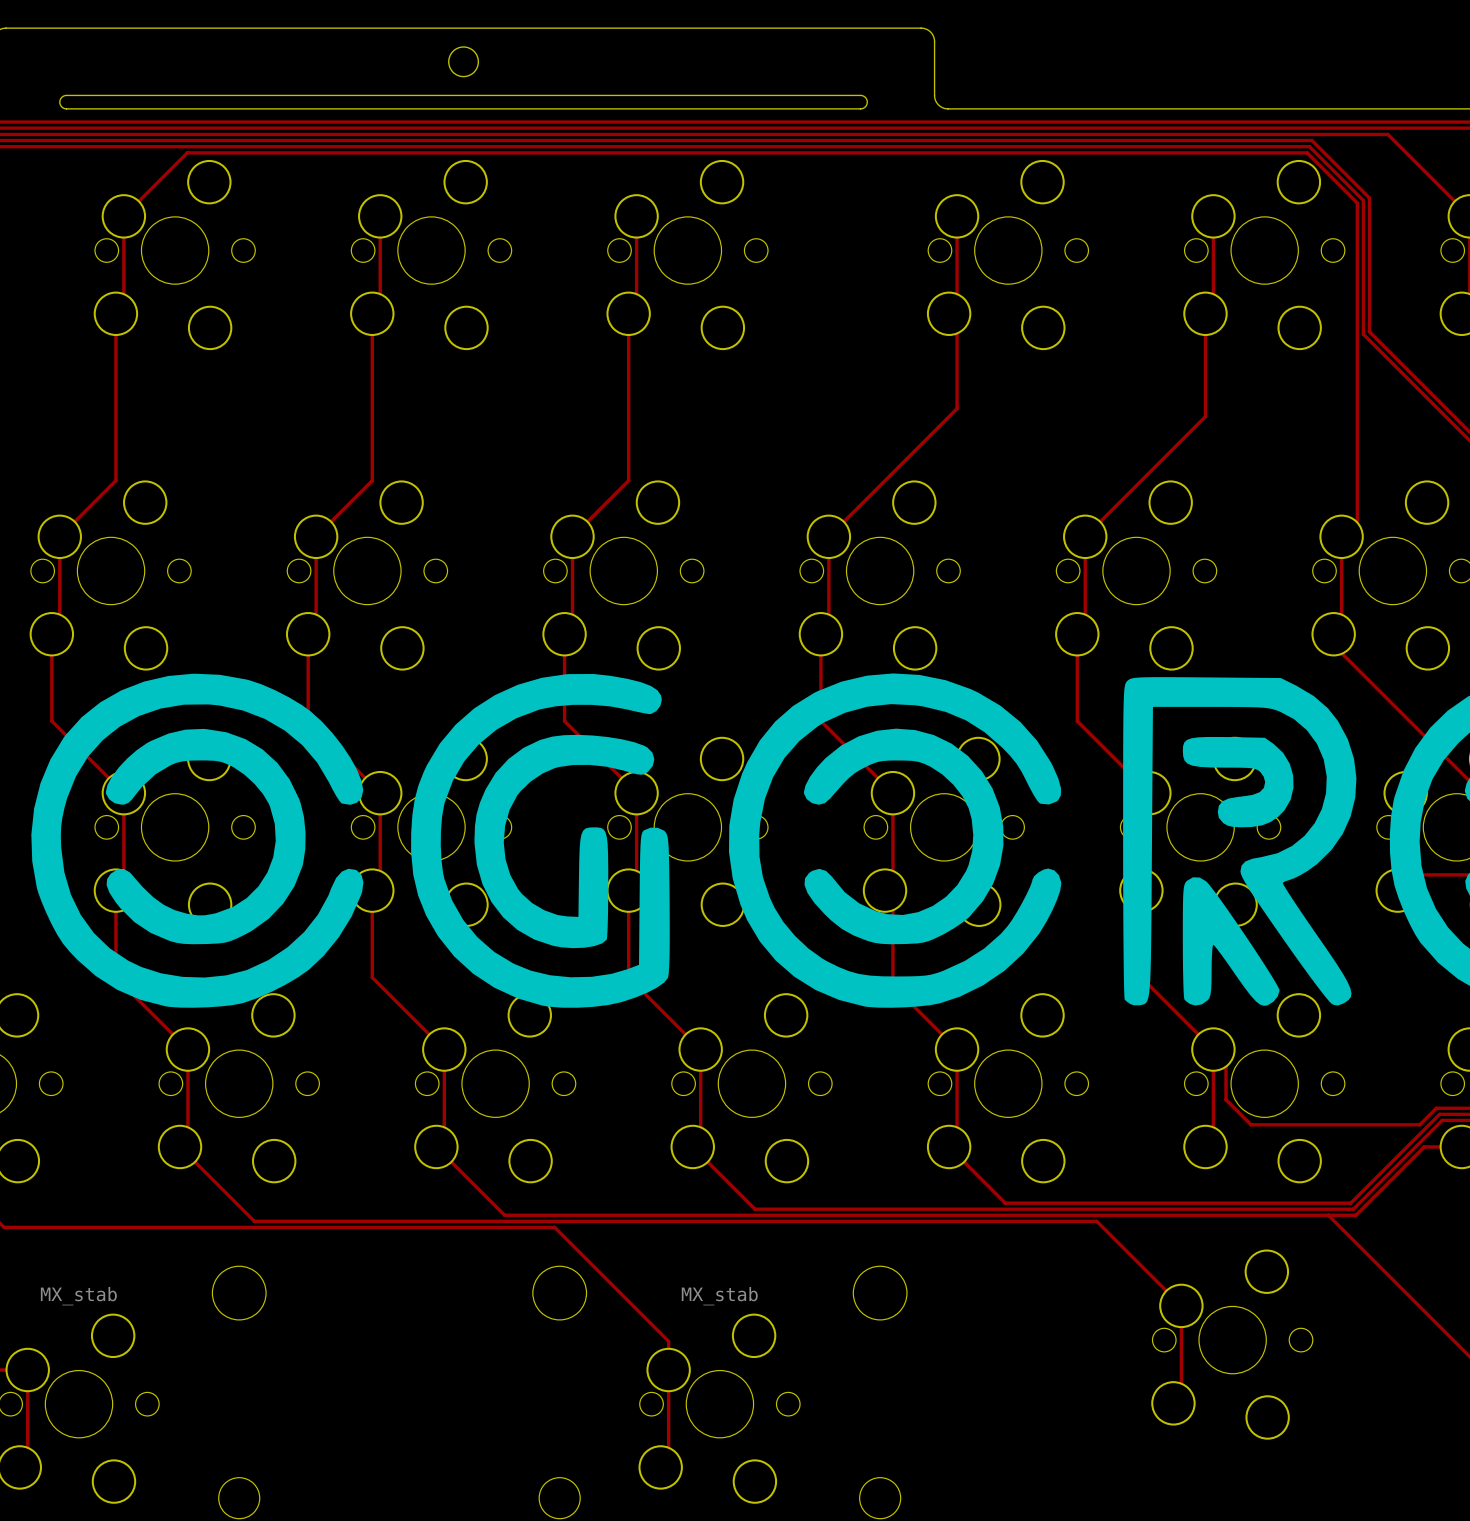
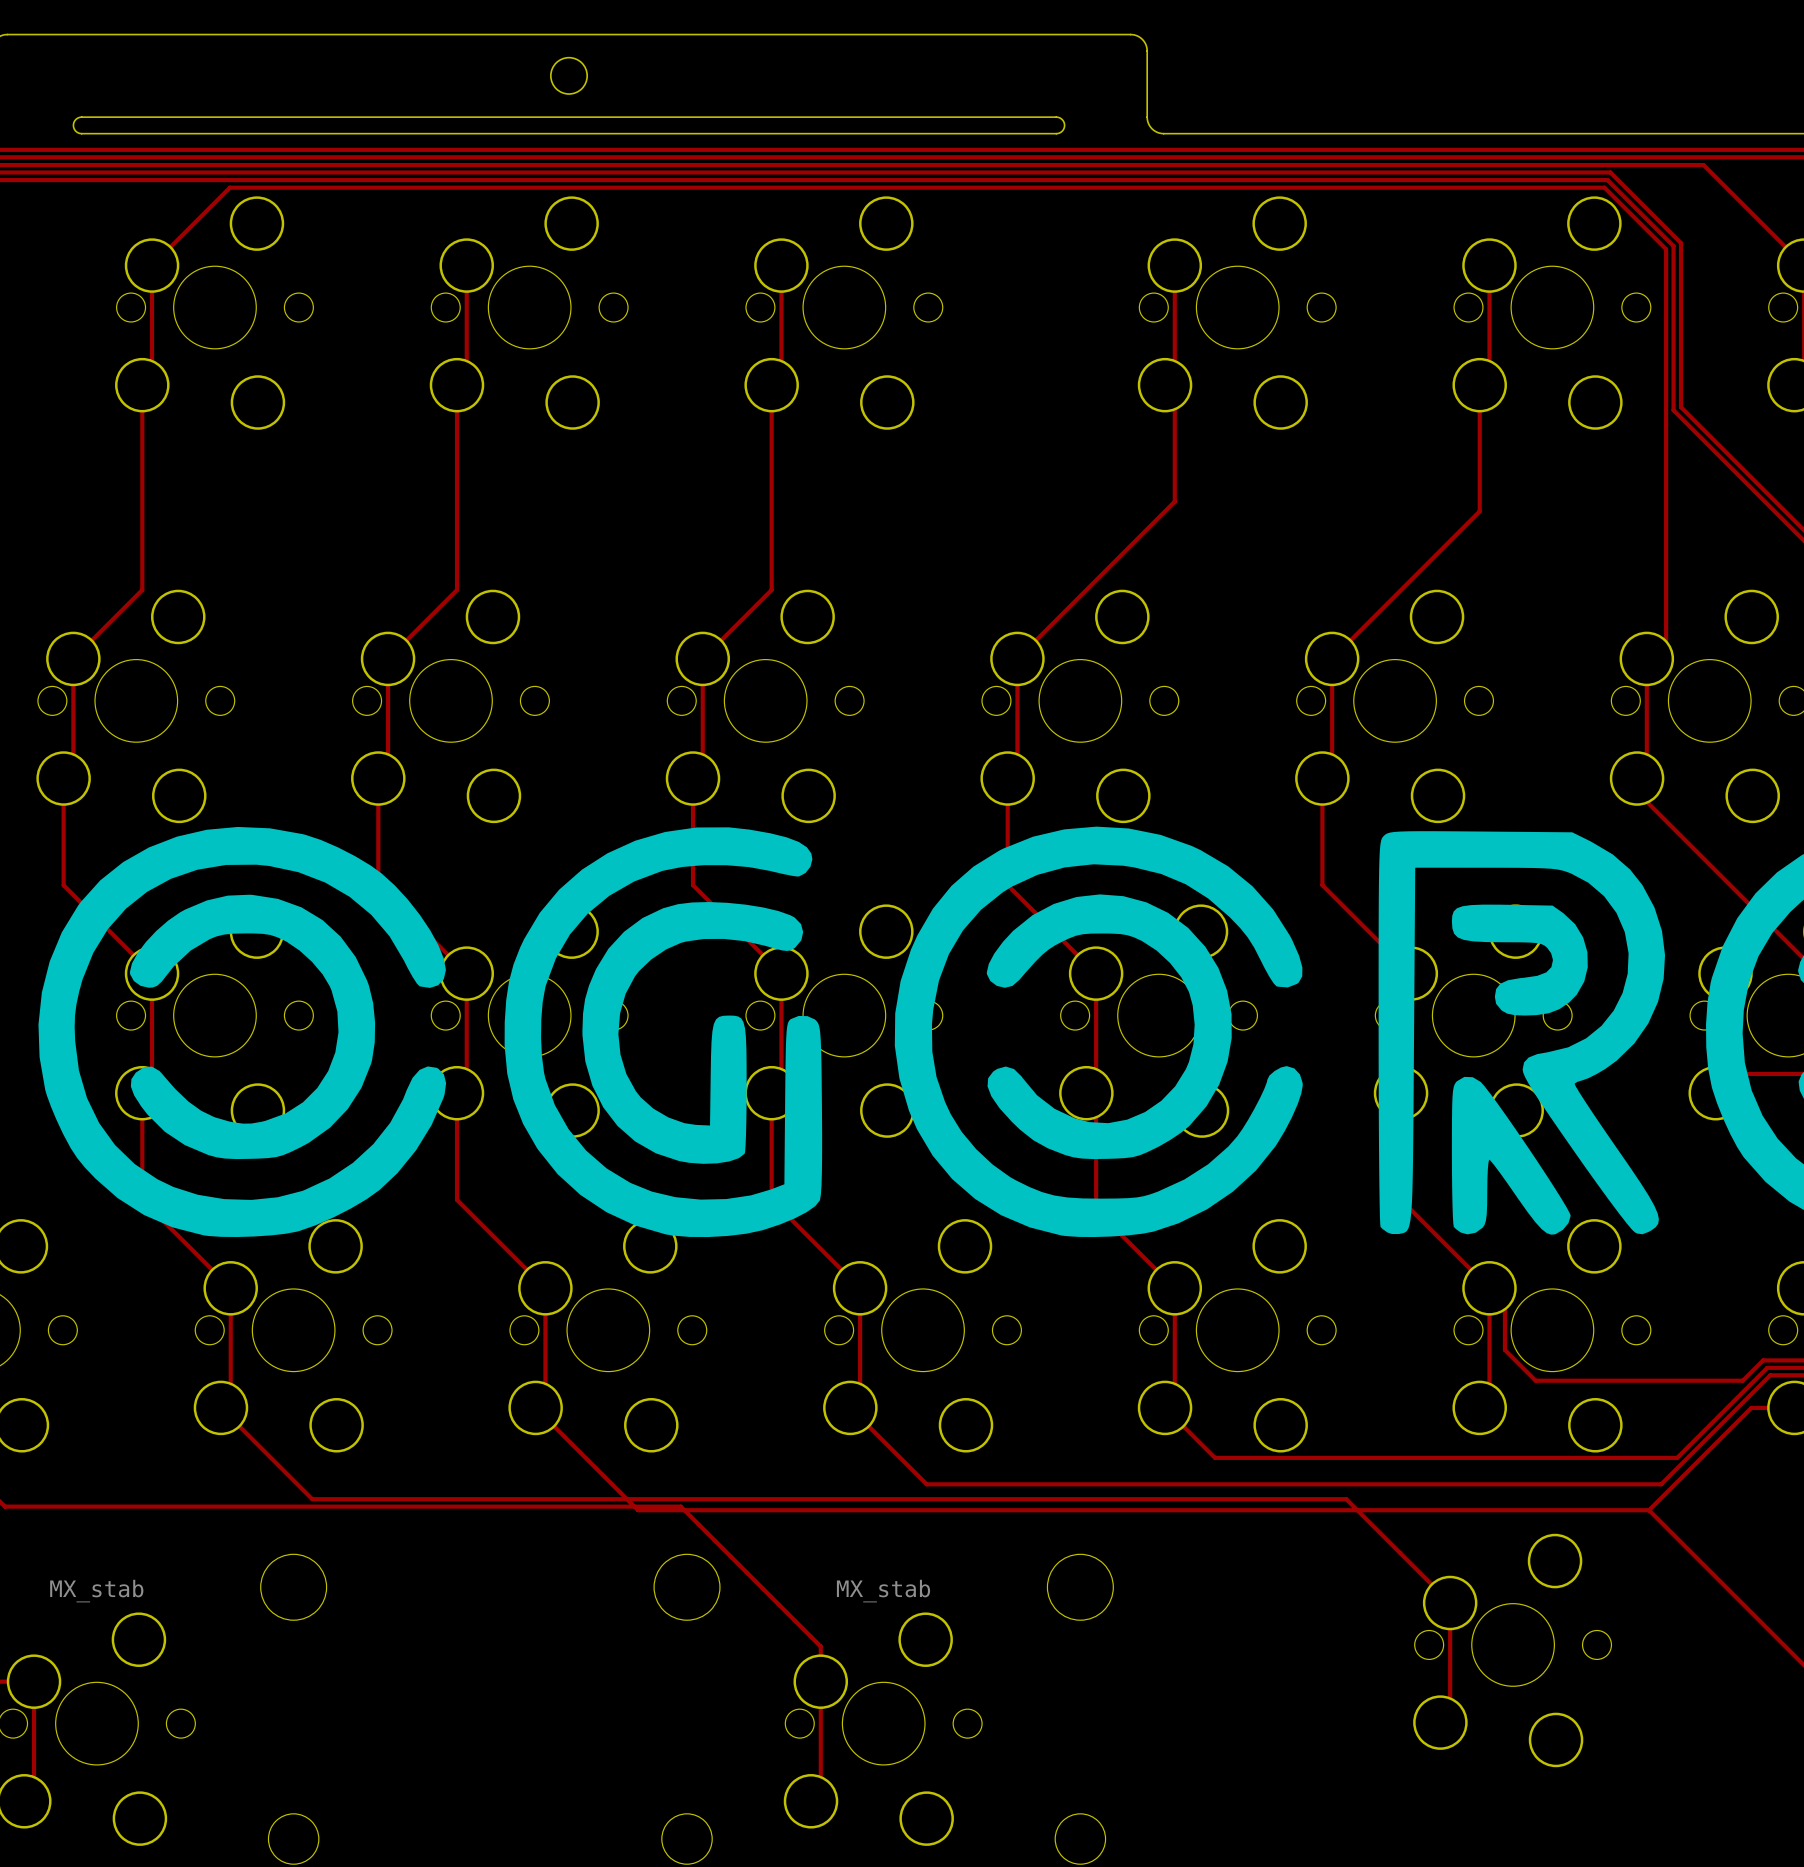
track: (1426, 1146) (1424, 1146) (1355, 1215) (504, 1215) -> (1751, 1407) (1649, 1510) (637, 1510) (619, 1491)
track: (989, 1187) (1005, 1203) (1350, 1203) (1366, 1187) -> (1215, 1457) (1677, 1457)
track: (1328, 1215) (1343, 1230) -> none

